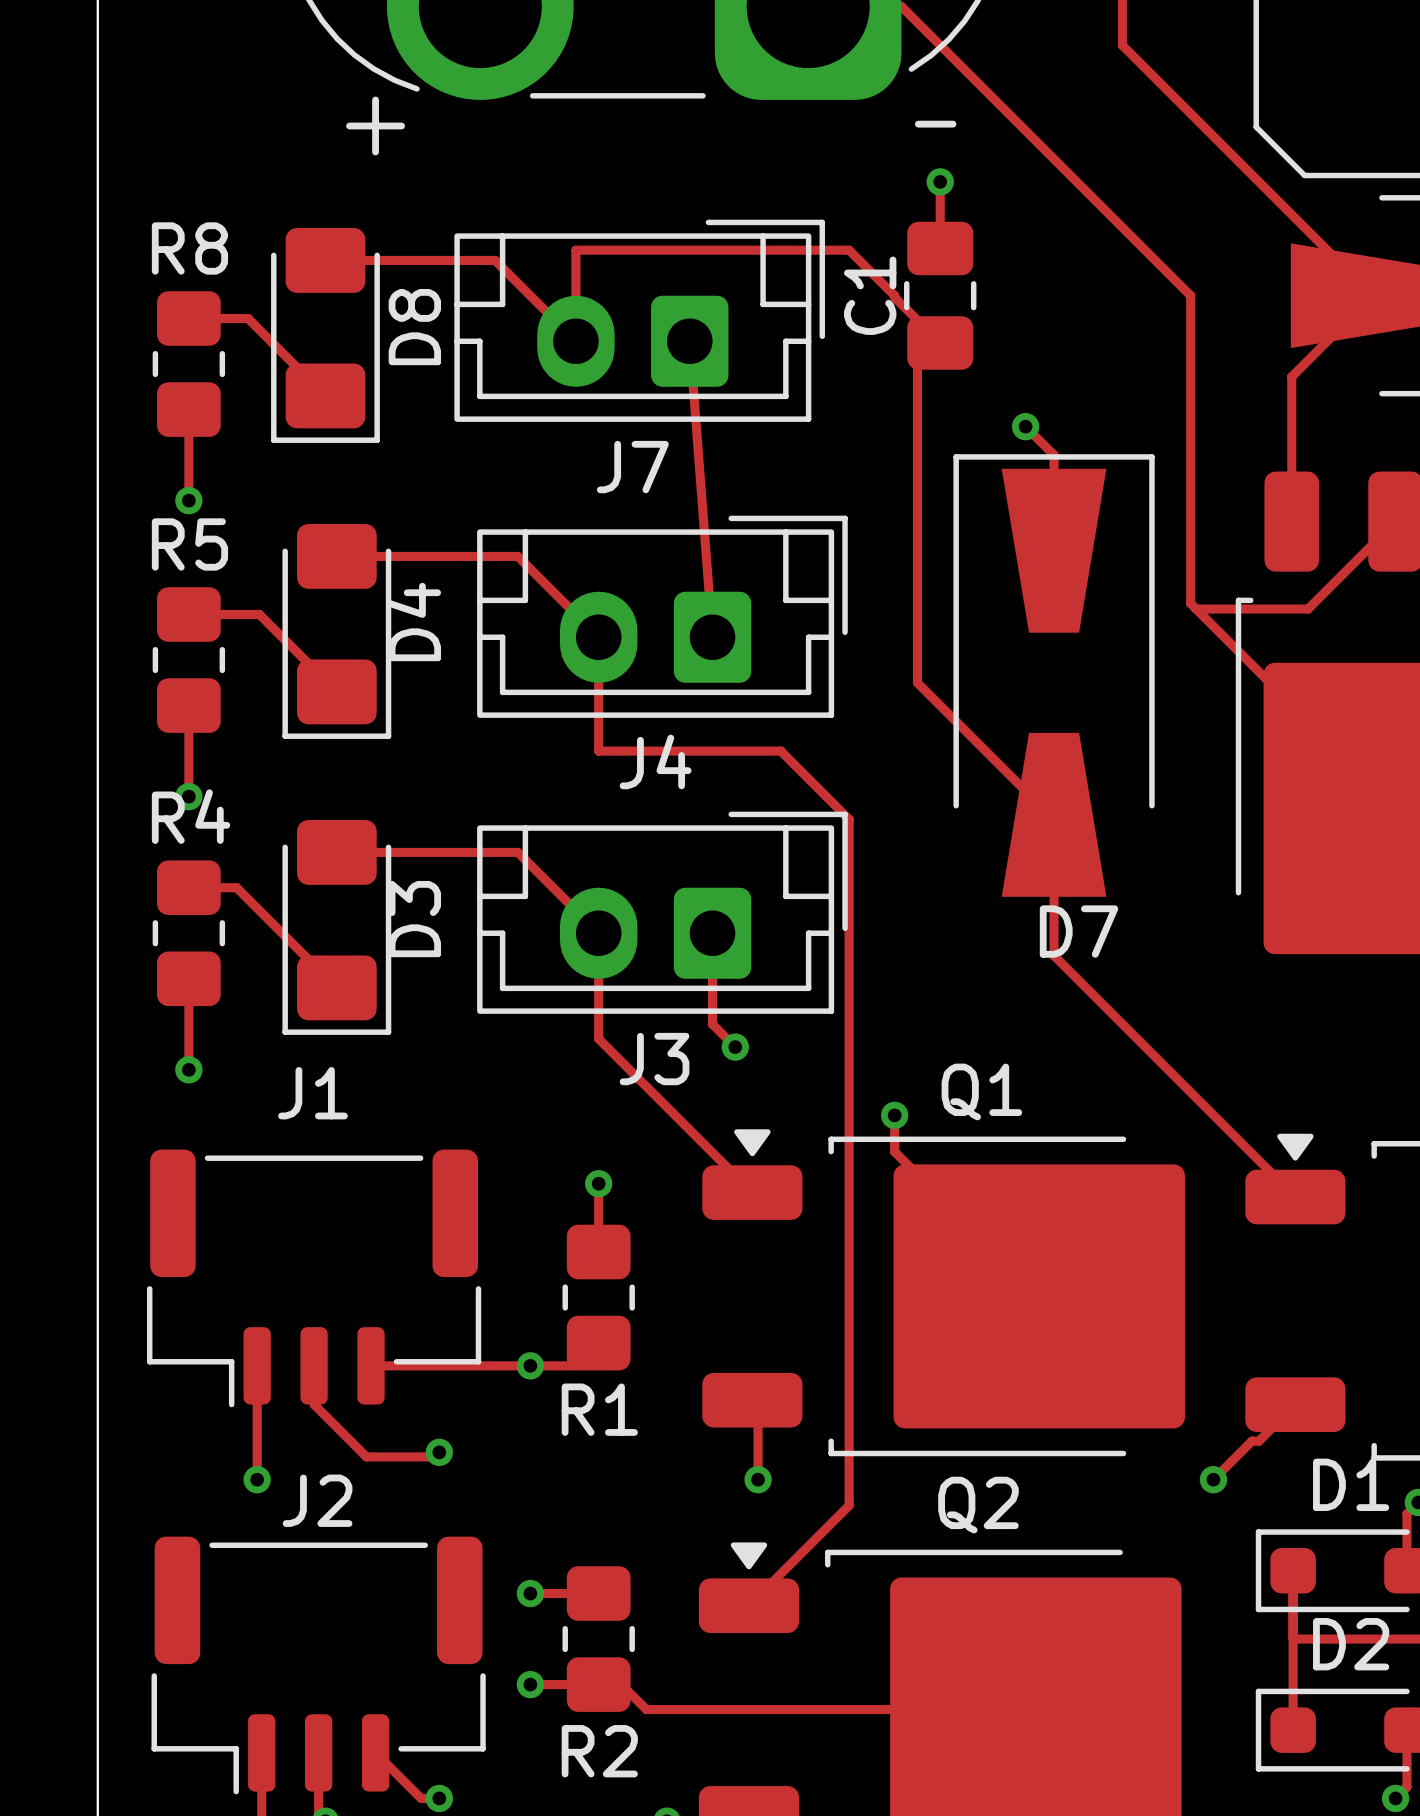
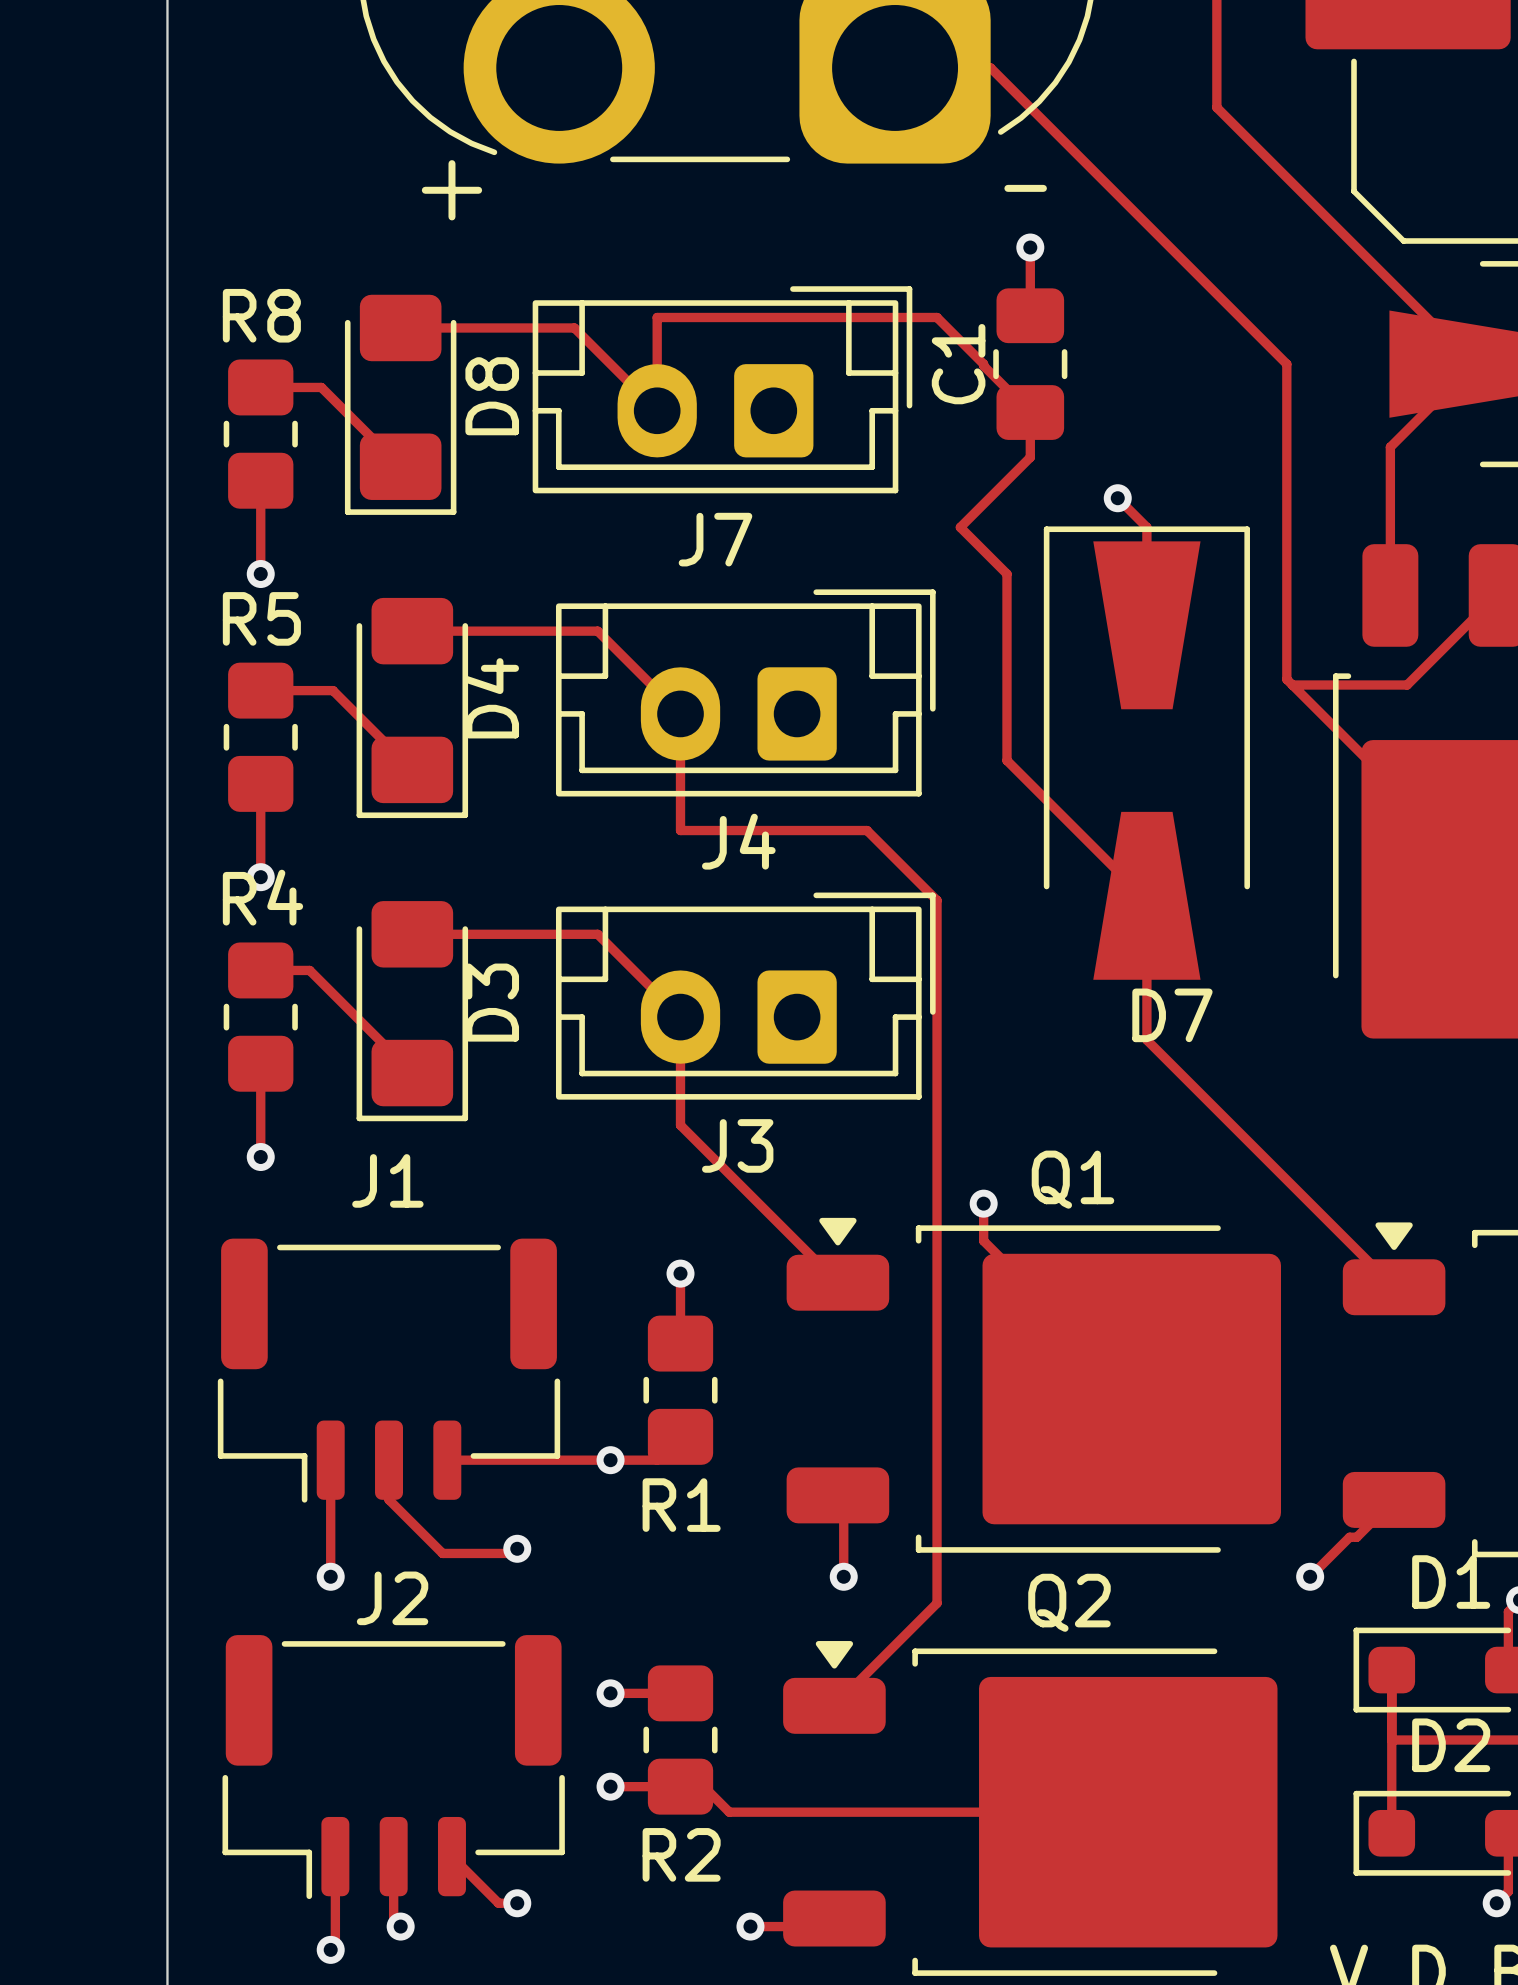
track: (689, 341) (712, 637) -> none
track: (940, 342) (917, 365) (917, 500) -> (1030, 412) (1030, 457) (960, 527) (1006, 574)
track: (712, 933) (712, 1024) (735, 1047) -> none
via: (735, 1047) -> none

